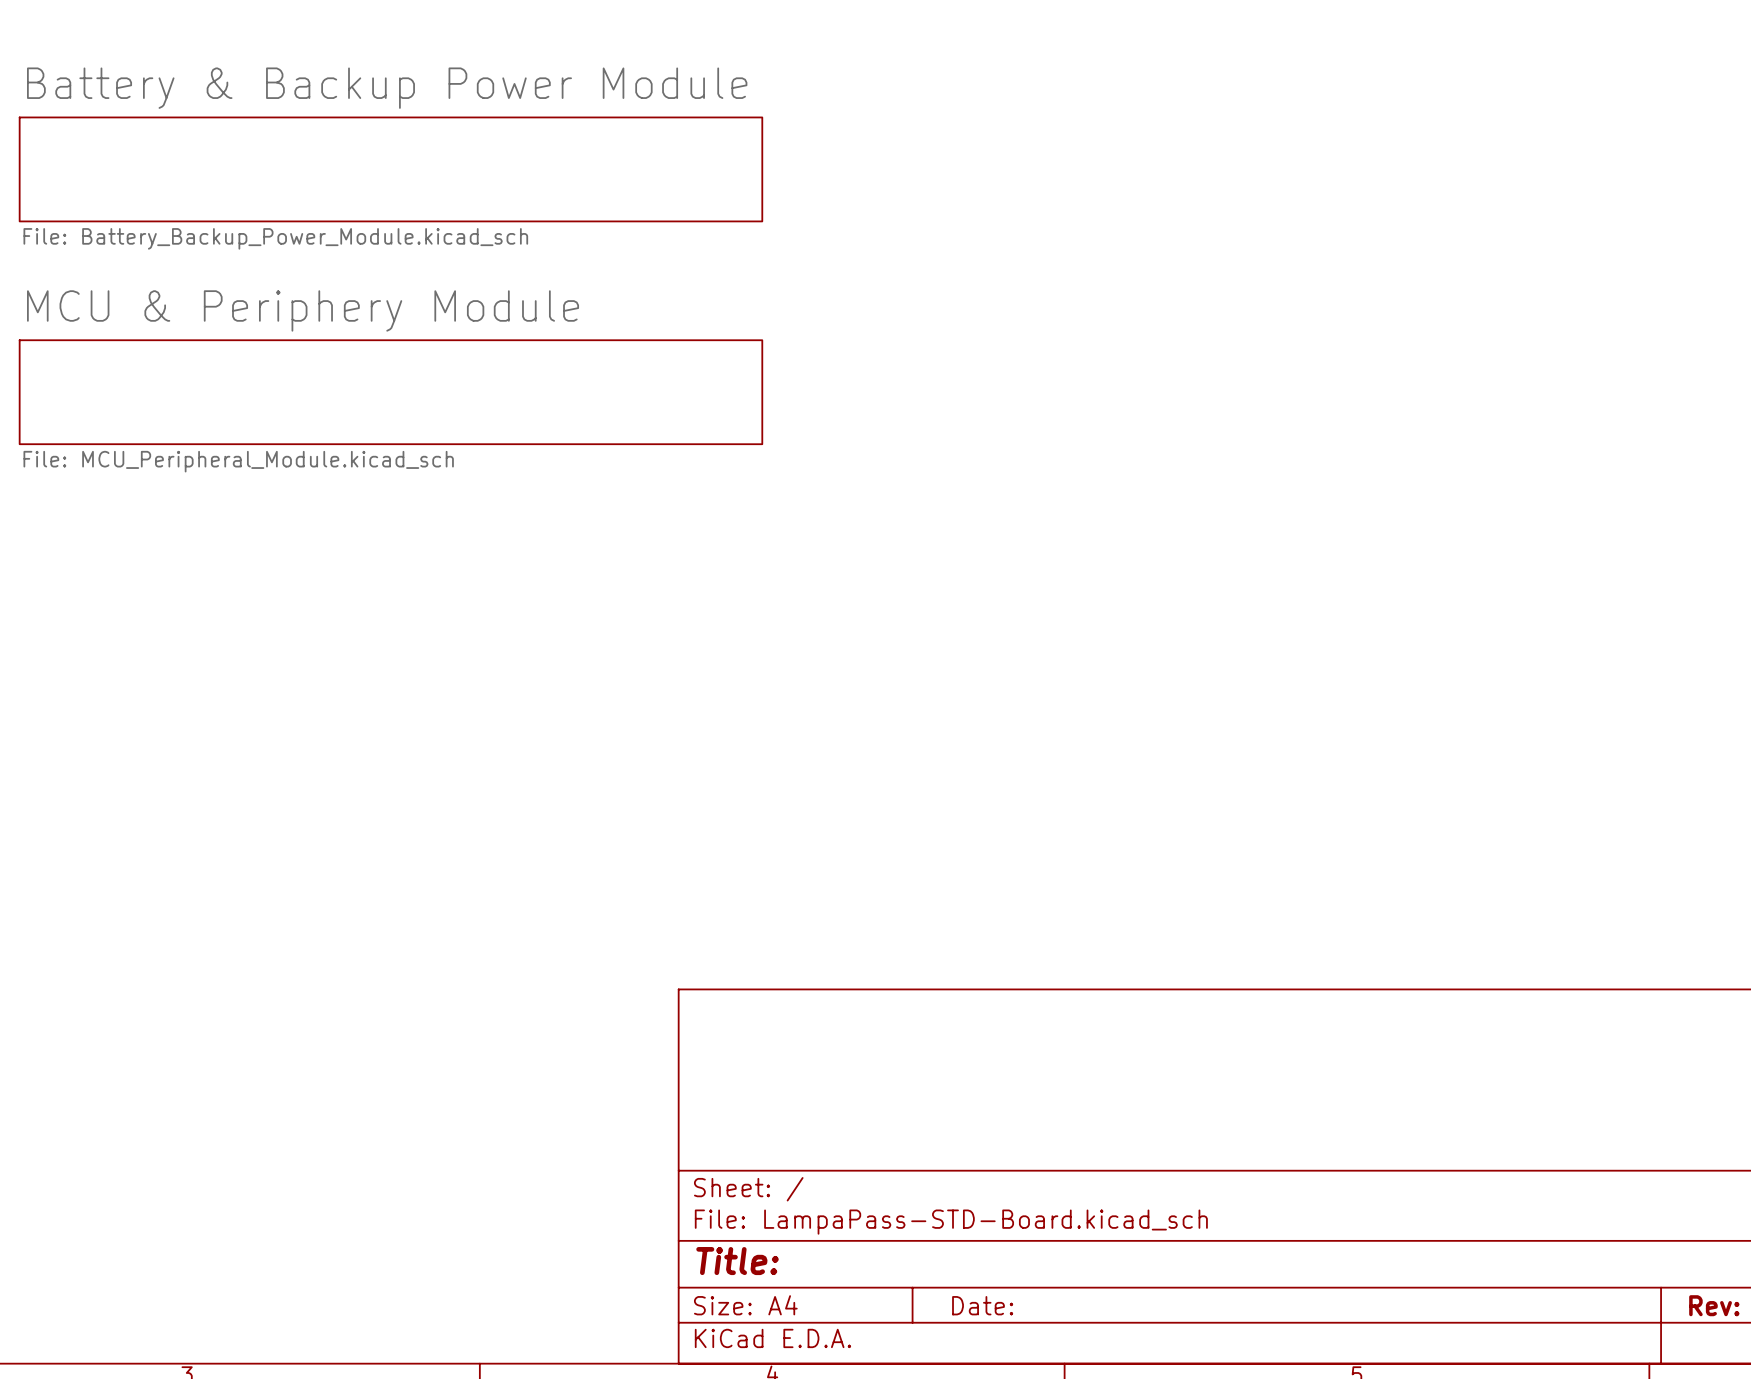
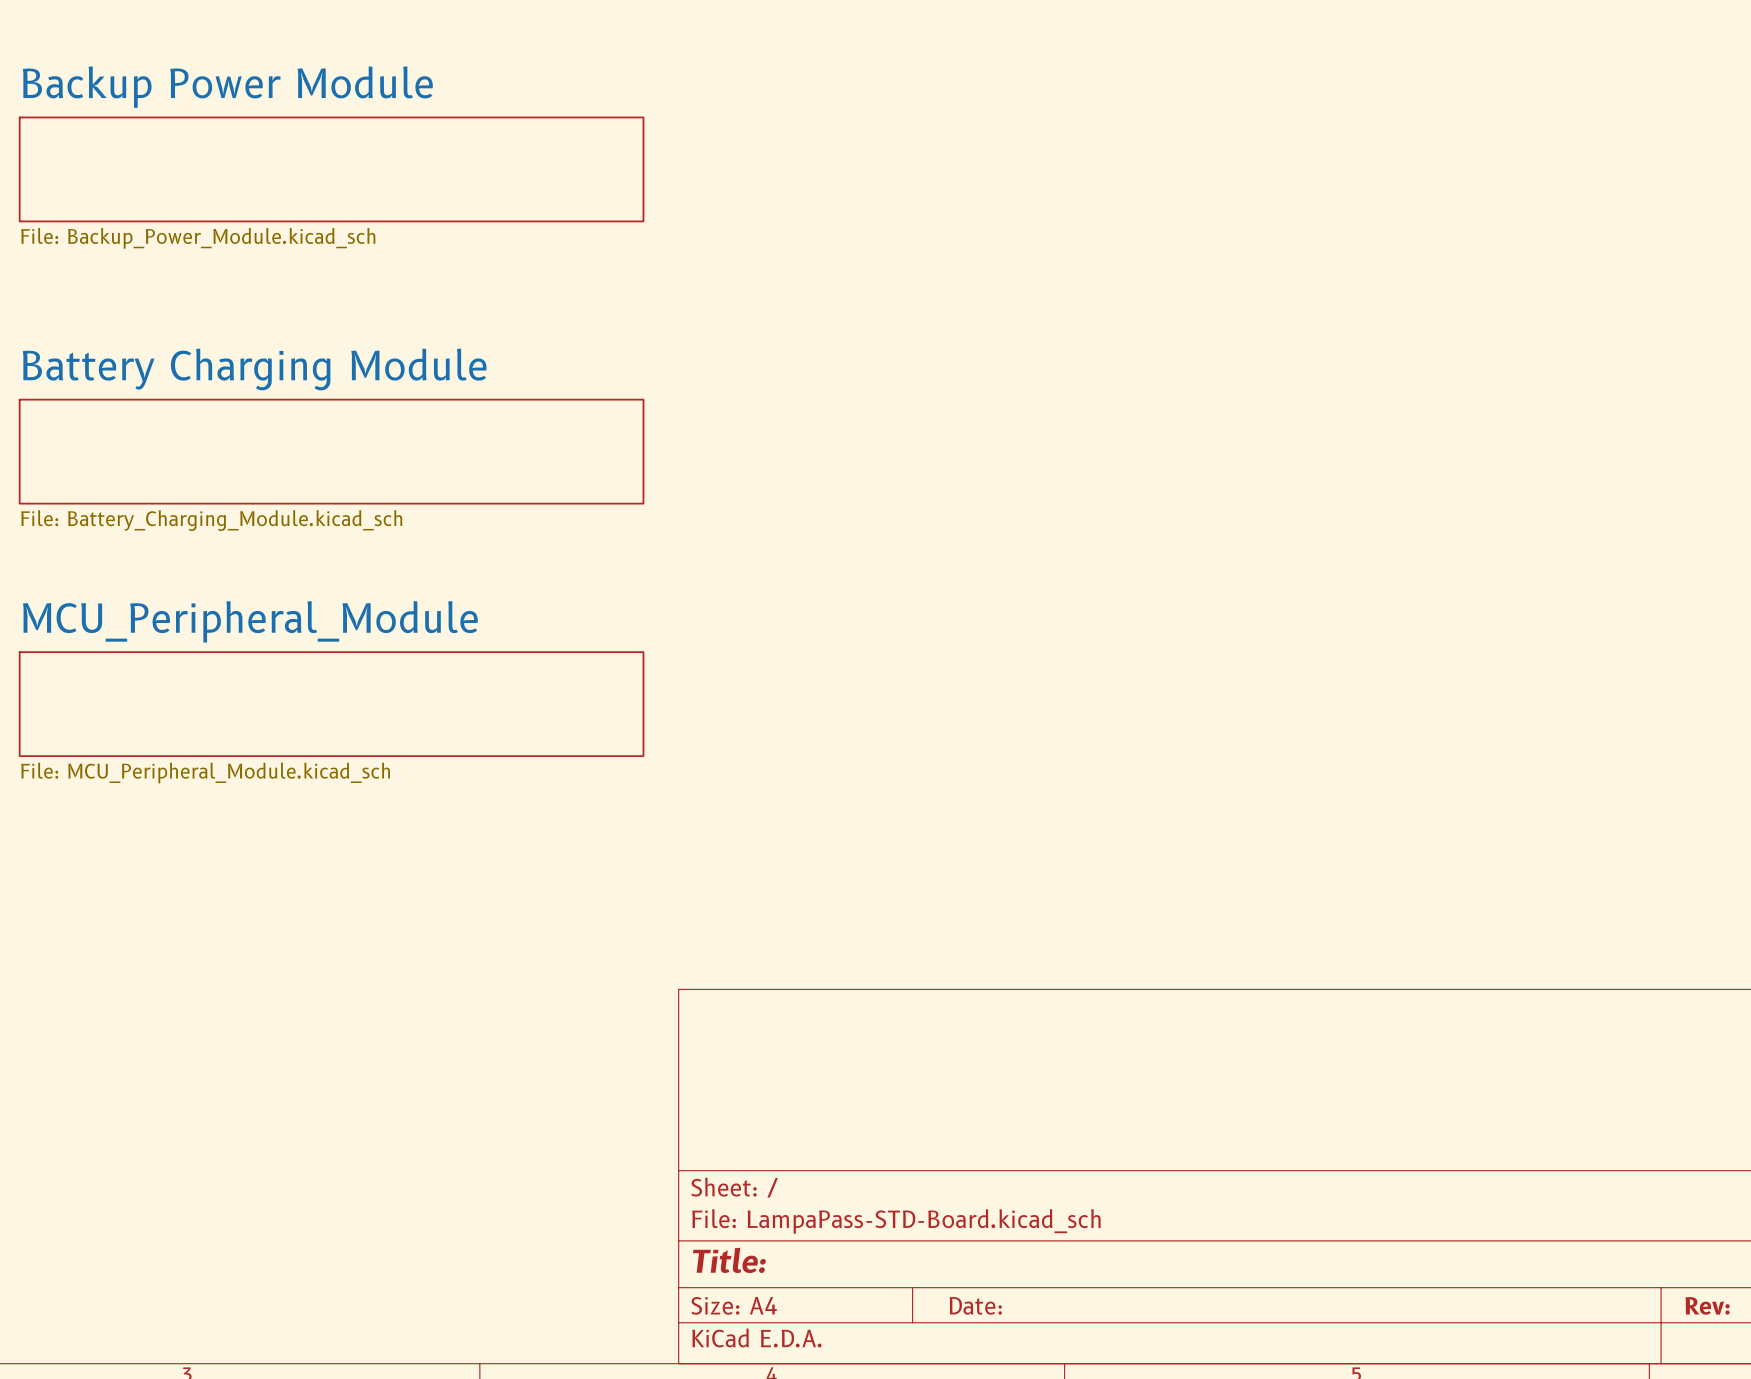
sheet Backup Power Module: none -> File: Backup_Power_Module.kicad_sch (331, 169)
sheet Battery & Backup Power Module: File: Battery_Backup_Power_Module.kicad_sch (390, 169) -> none
sheet MCU & Periphery Module: File: MCU_Peripheral_Module.kicad_sch (390, 392) -> none
sheet Battery Charging Module: none -> File: Battery_Charging_Module.kicad_sch (331, 451)
sheet MCU_Peripheral_Module: none -> File: MCU_Peripheral_Module.kicad_sch (331, 704)

